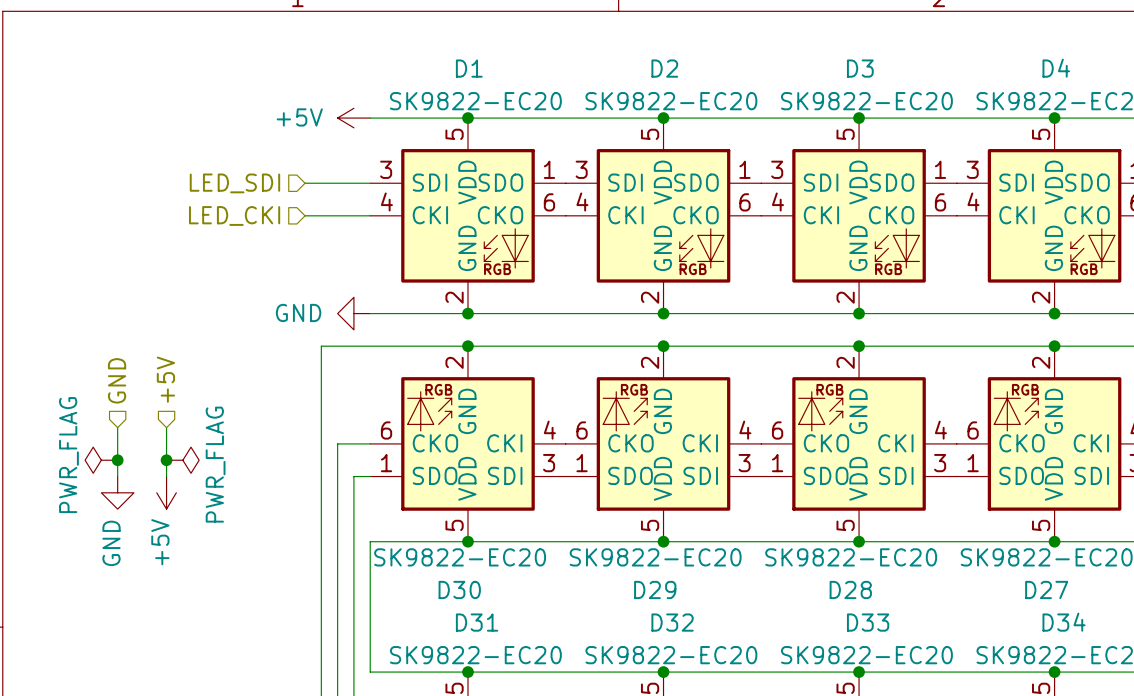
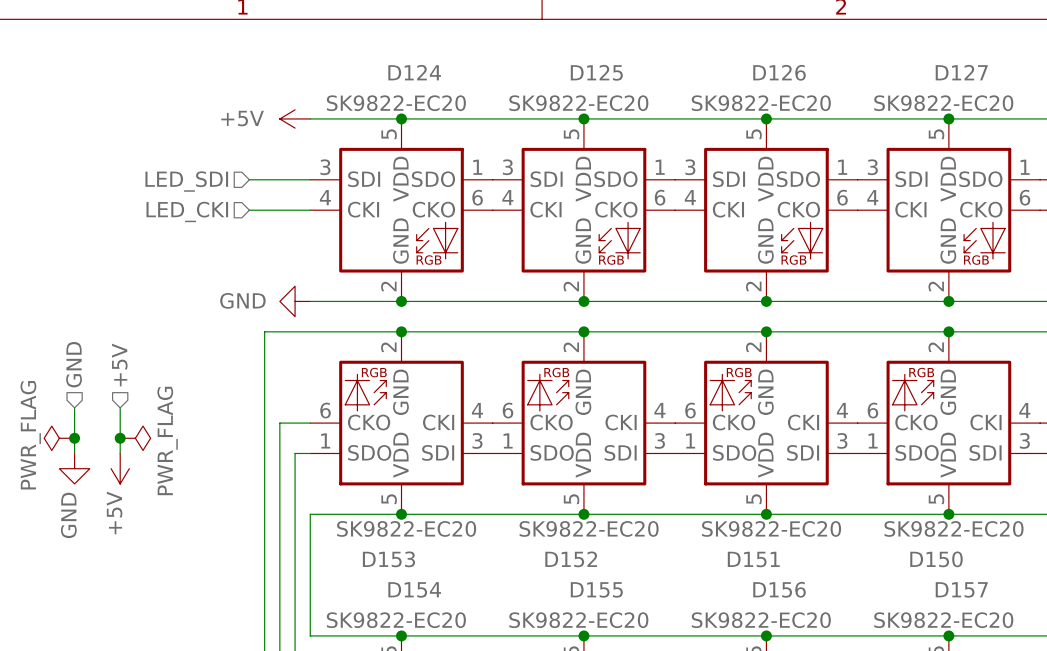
D1 name: D1 (469, 68) -> D124 (414, 72)
D2 name: D2 (664, 68) -> D125 (596, 72)
D3 name: D3 (860, 68) -> D126 (779, 72)
D4 name: D4 (1056, 68) -> D127 (961, 72)
D30 name: D30 (459, 589) -> D153 (388, 559)
D29 name: D29 (655, 589) -> D152 (571, 559)
D28 name: D28 (850, 589) -> D151 (753, 559)
D27 name: D27 (1046, 589) -> D150 (936, 559)
D31 name: D31 (477, 622) -> D154 (414, 589)
D32 name: D32 (672, 622) -> D155 (596, 589)
D33 name: D33 (868, 622) -> D156 (779, 589)
D34 name: D34 (1064, 622) -> D157 (961, 589)

